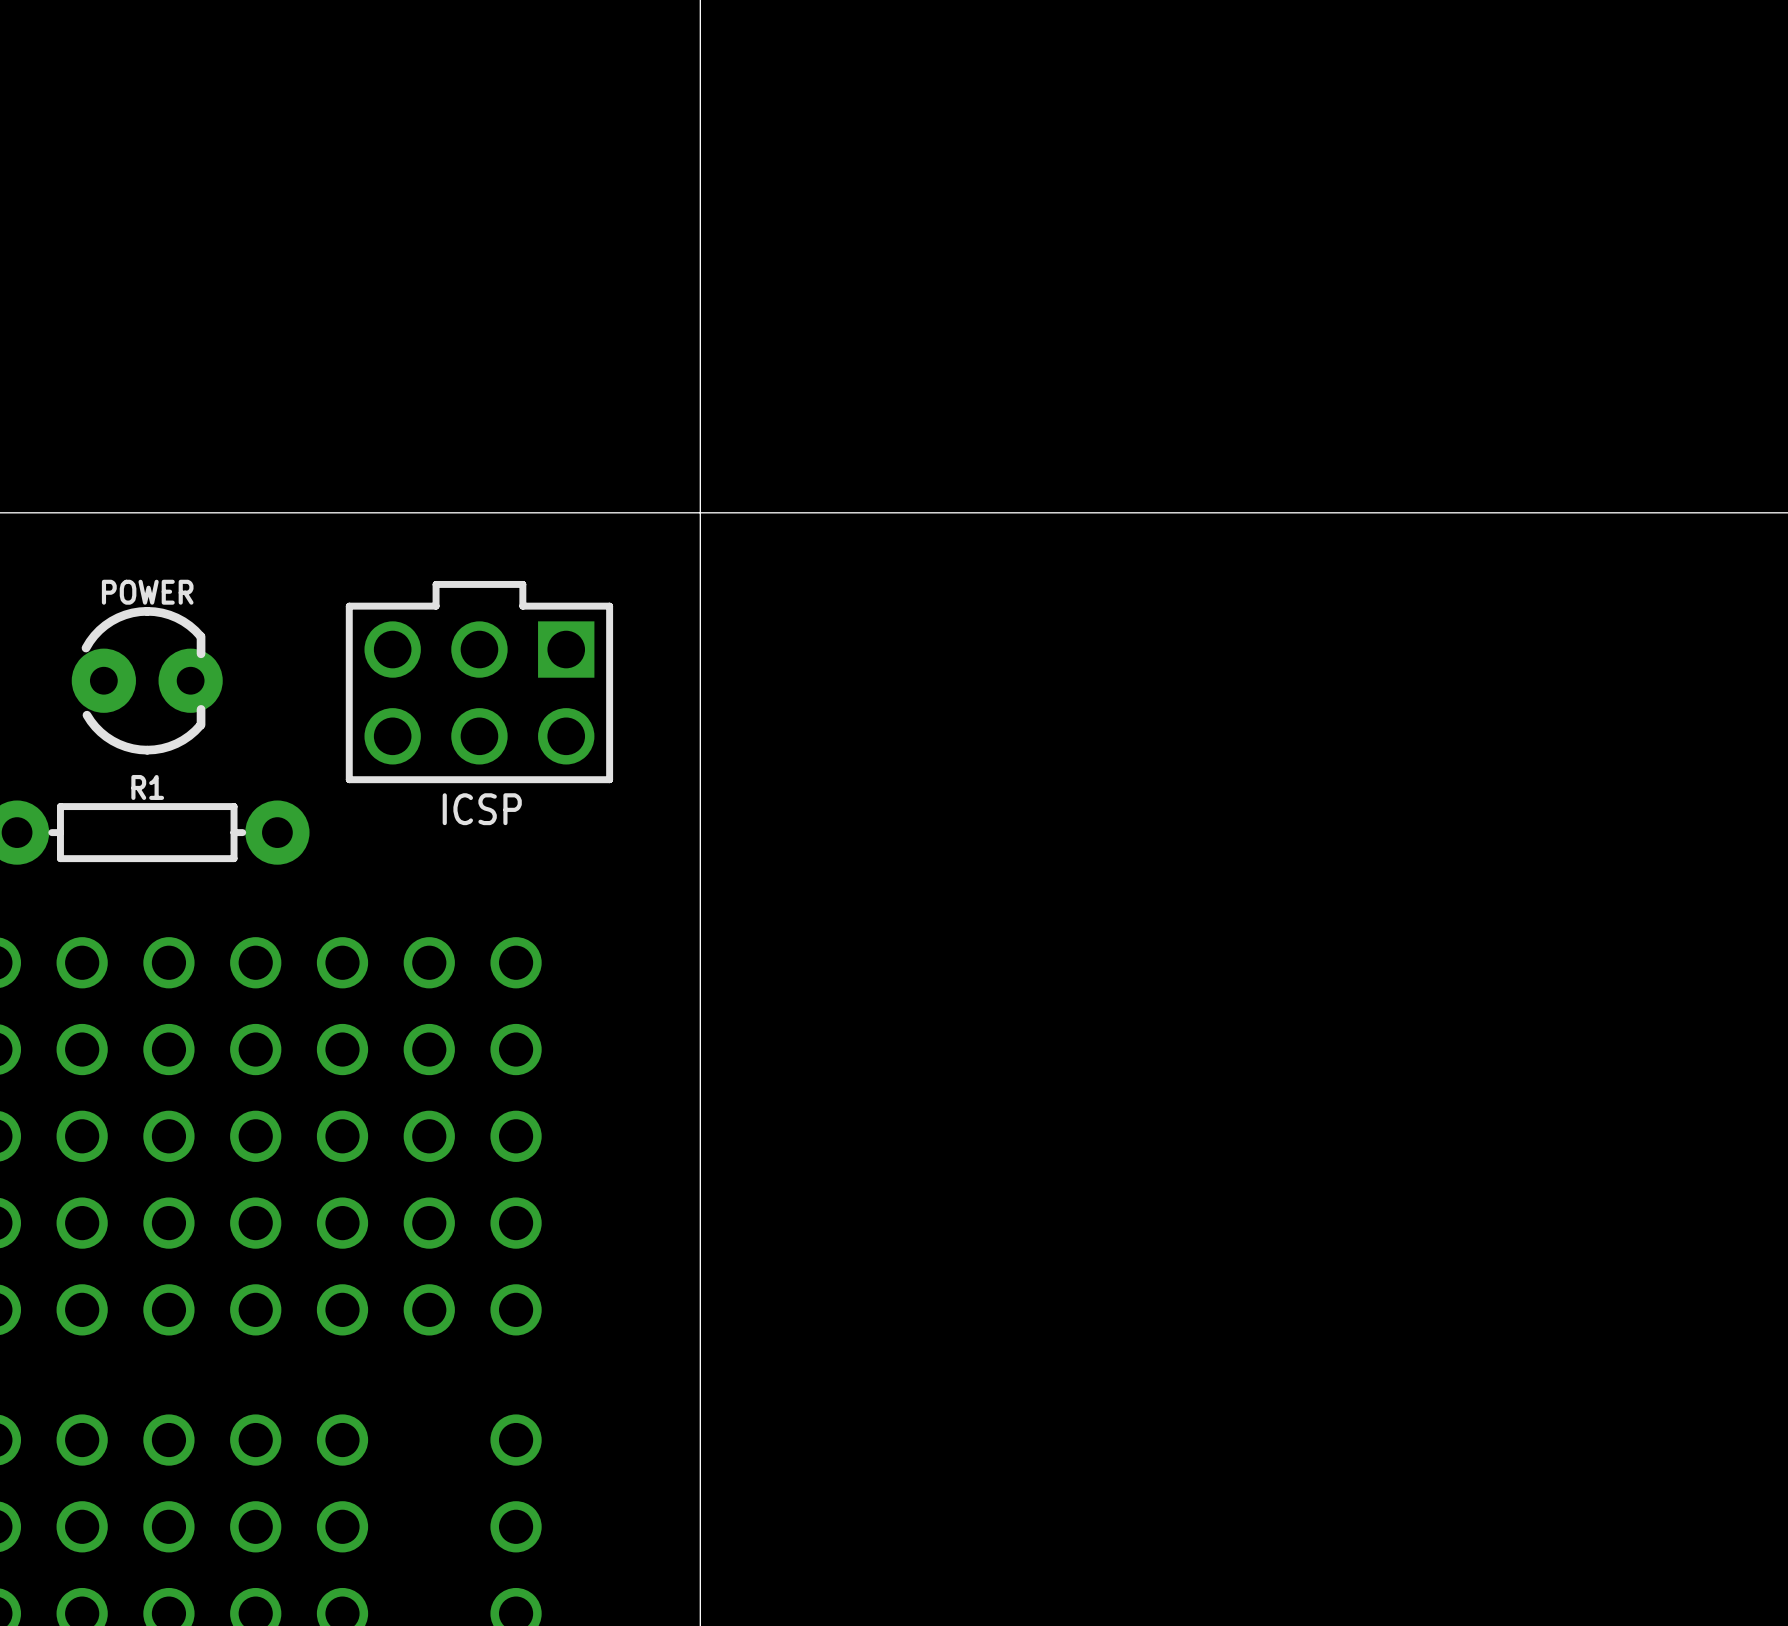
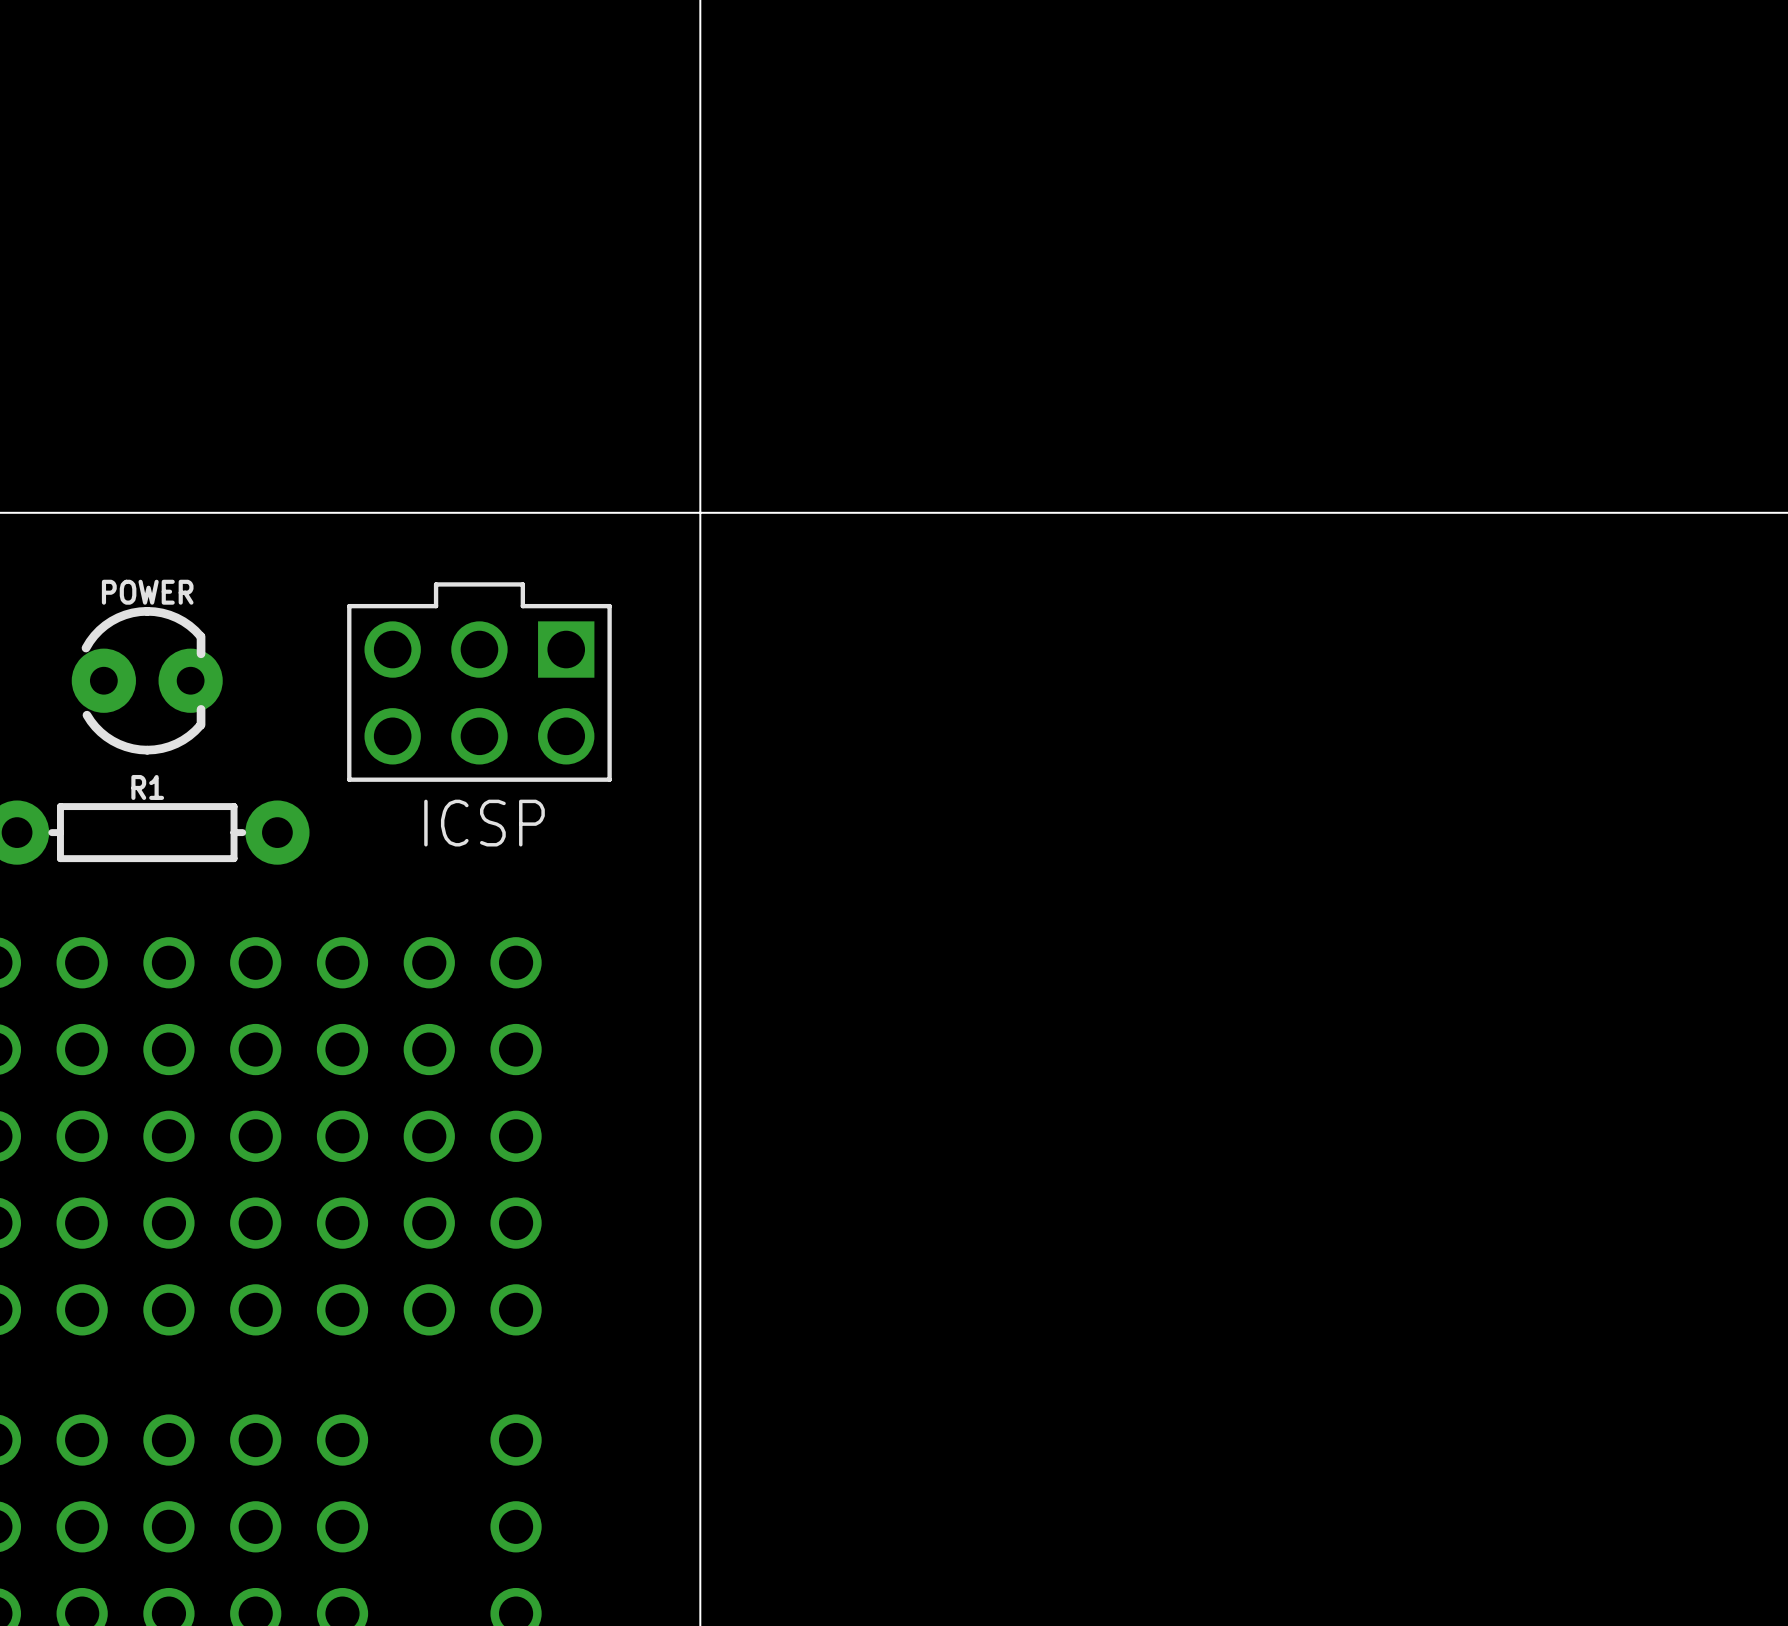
part footprint: [345, 580, 614, 784] -> [347, 582, 612, 782]

